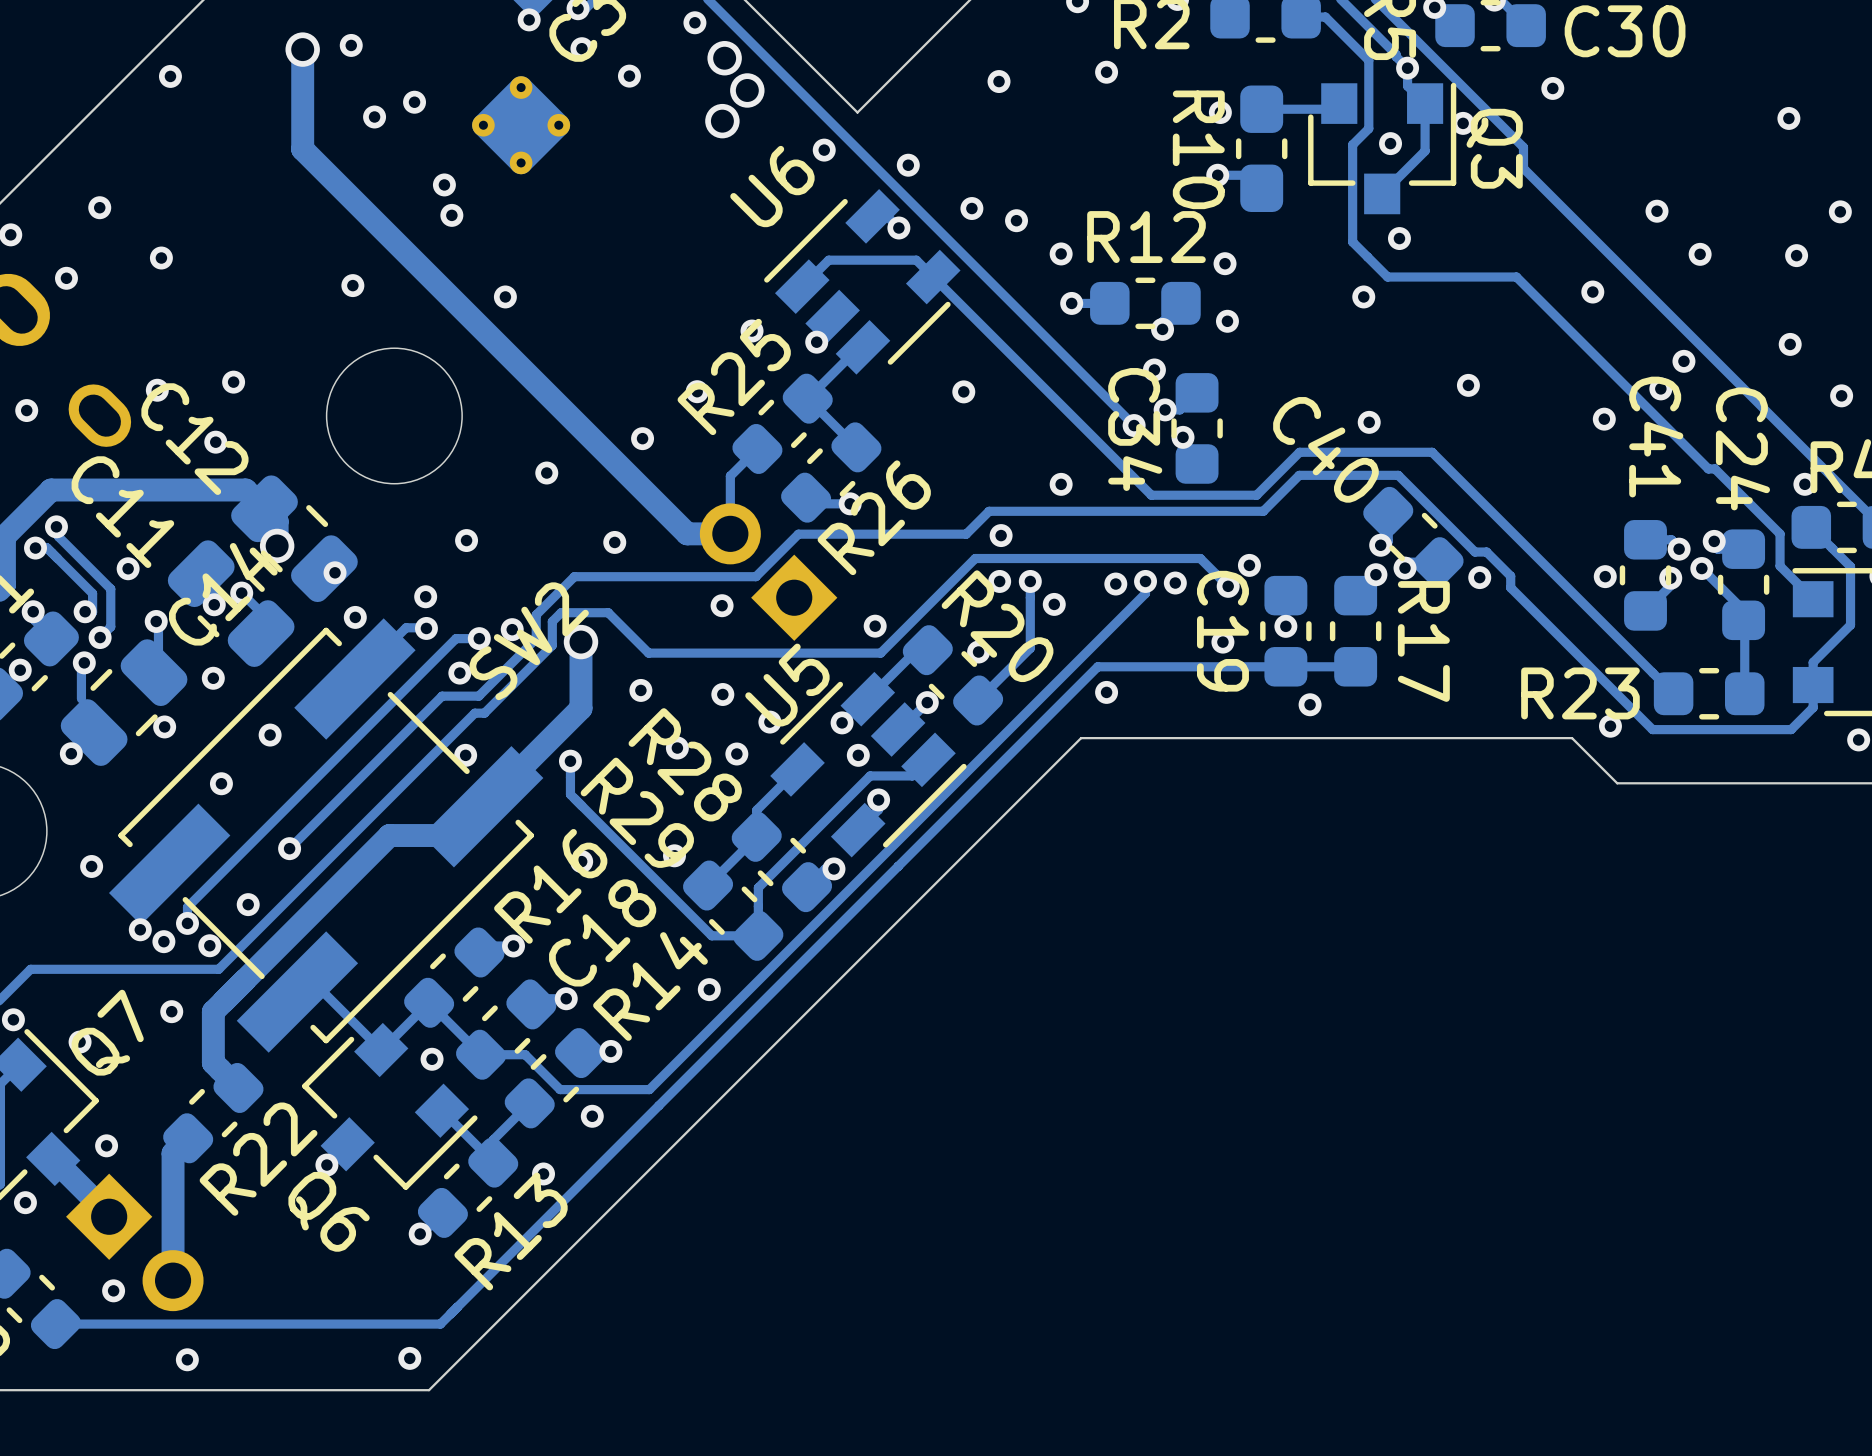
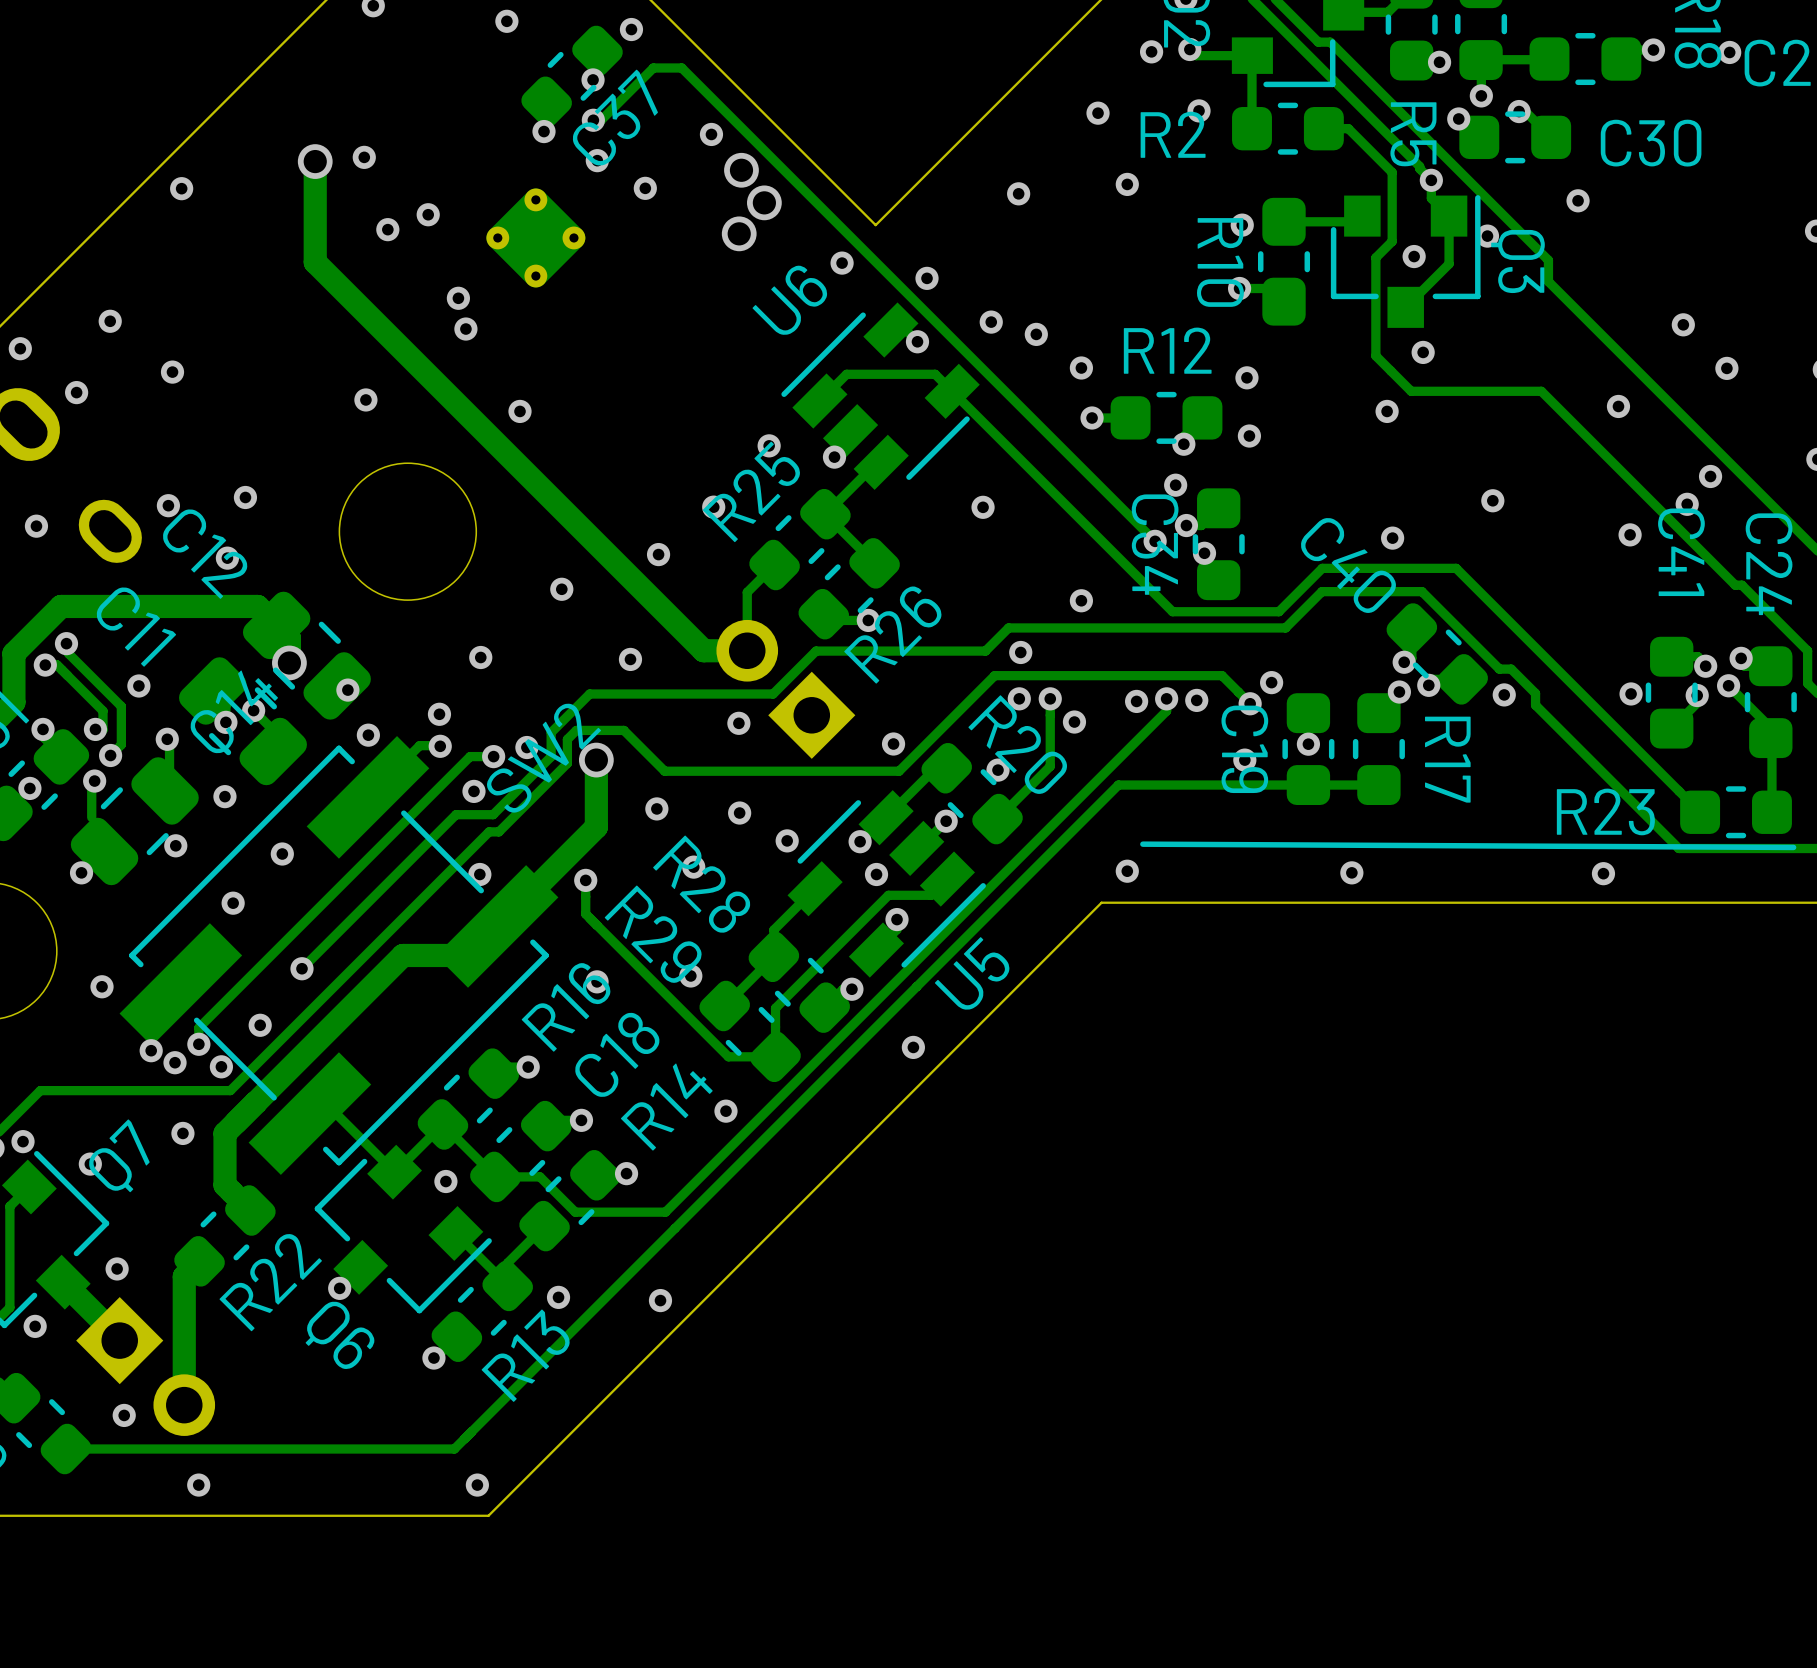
U5 name position: U5 (787, 685) -> U5 (972, 973)
via position: (1106, 692) -> (1127, 871)
via position: (1310, 704) -> (1351, 872)
line: none -> (1142, 844) (1793, 847)
via position: (1610, 726) -> (1603, 873)
via: (736, 754) -> none
board edge: (1617, 783) (1572, 738) (1081, 738) (429, 1390) -> (1643, 902) (1101, 902) (488, 1515) (442, 1515)
via: none -> (913, 1047)
via position: (592, 1116) -> (660, 1300)
via position: (409, 1358) -> (477, 1485)

